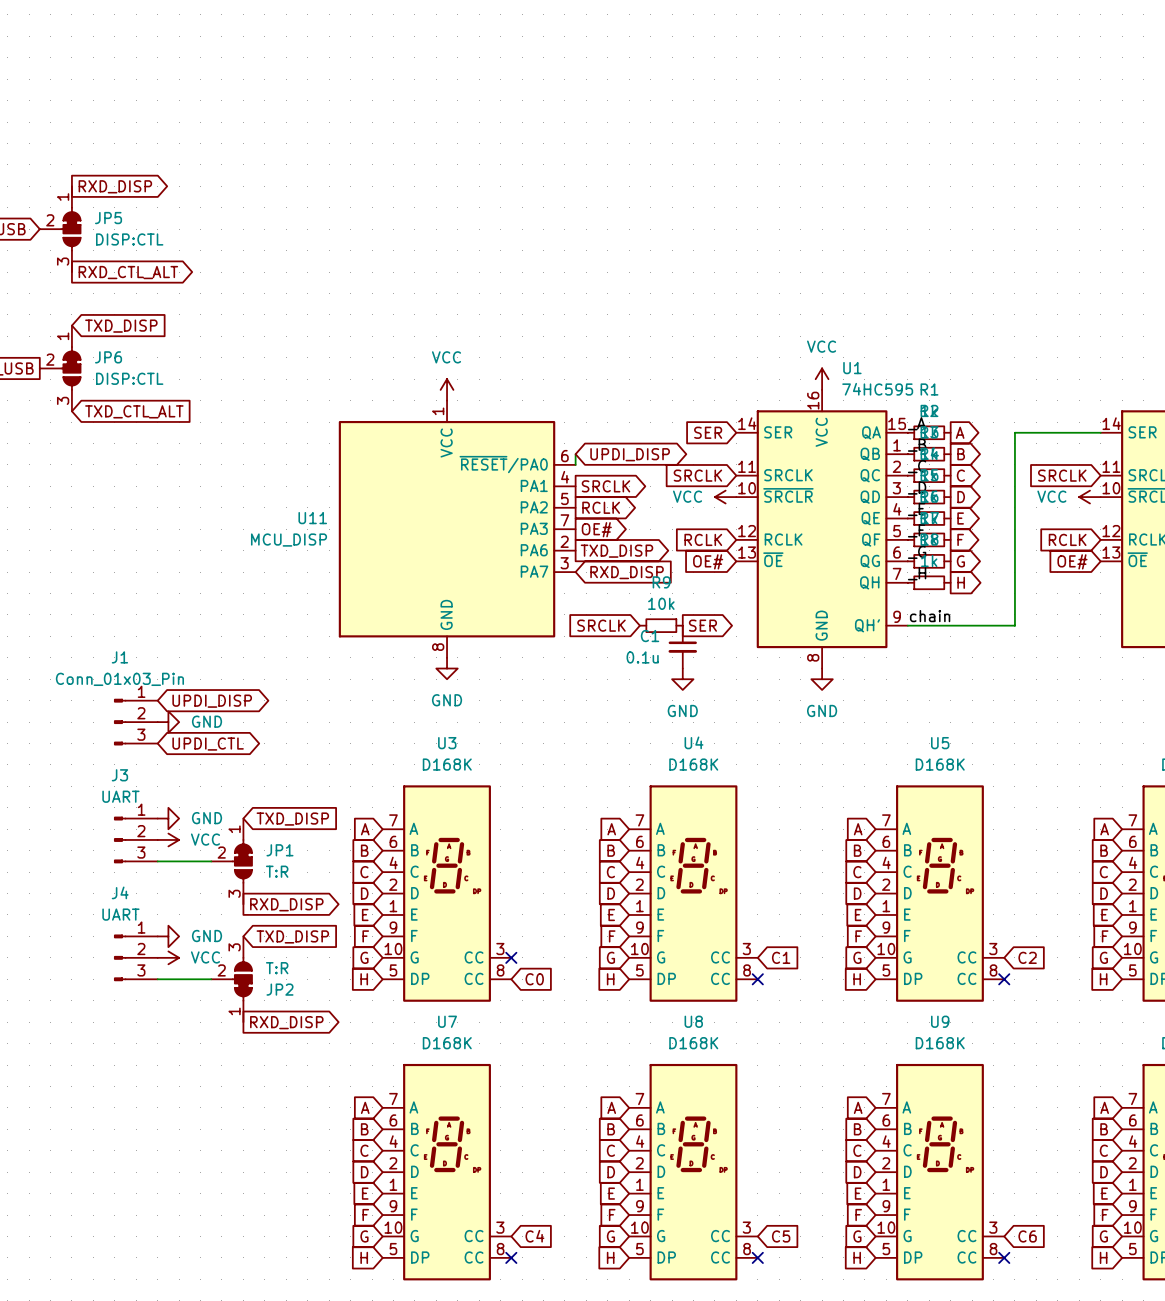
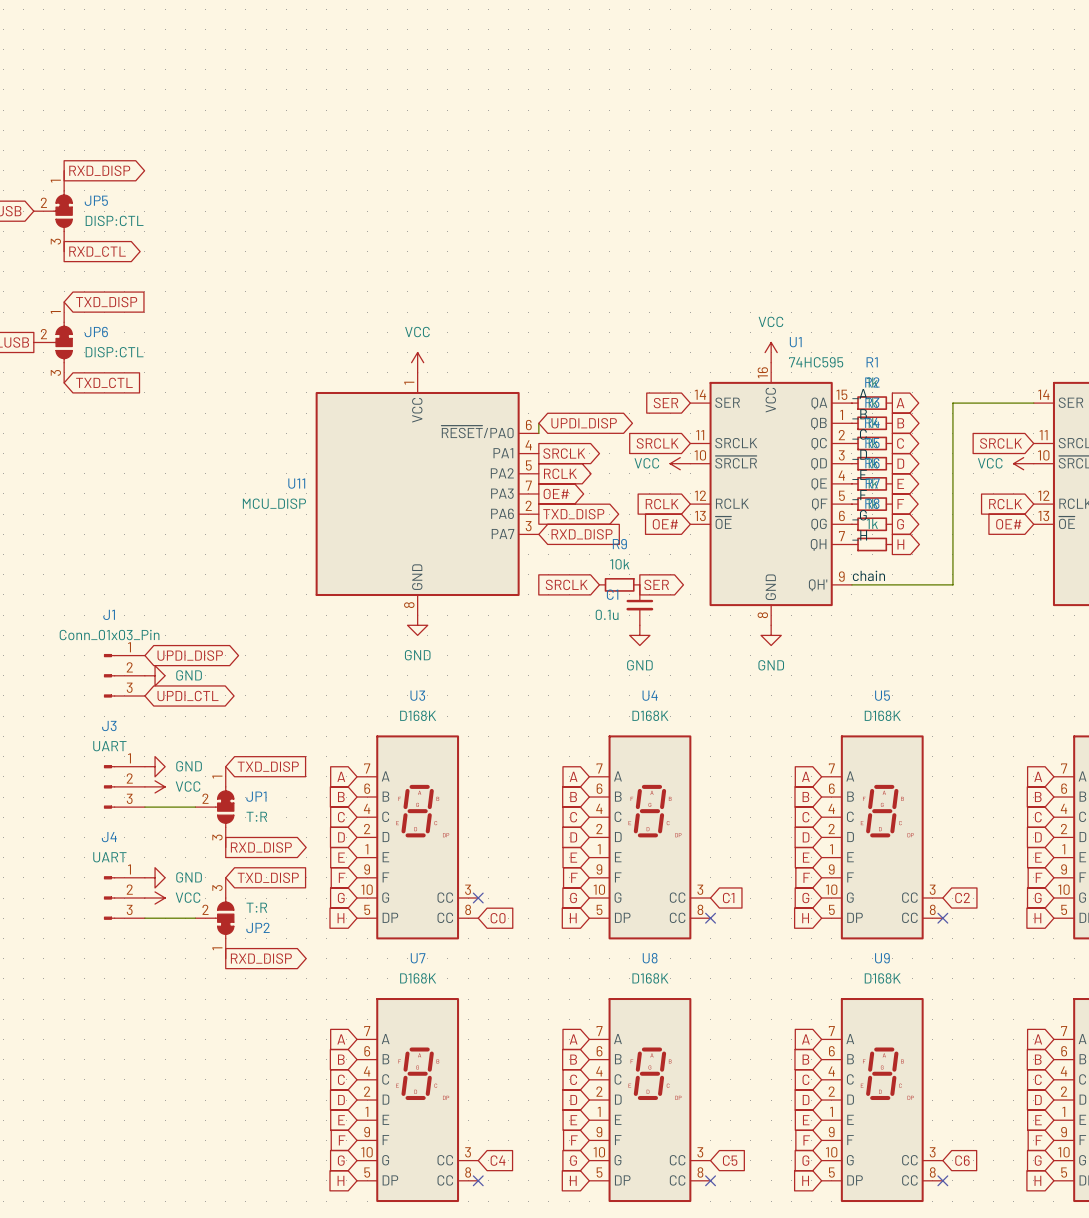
global label: RXD_CTL_ALT (128, 272) -> RXD_CTL (97, 251)
global label: TXD_CTL_ALT (134, 411) -> TXD_CTL (104, 382)

